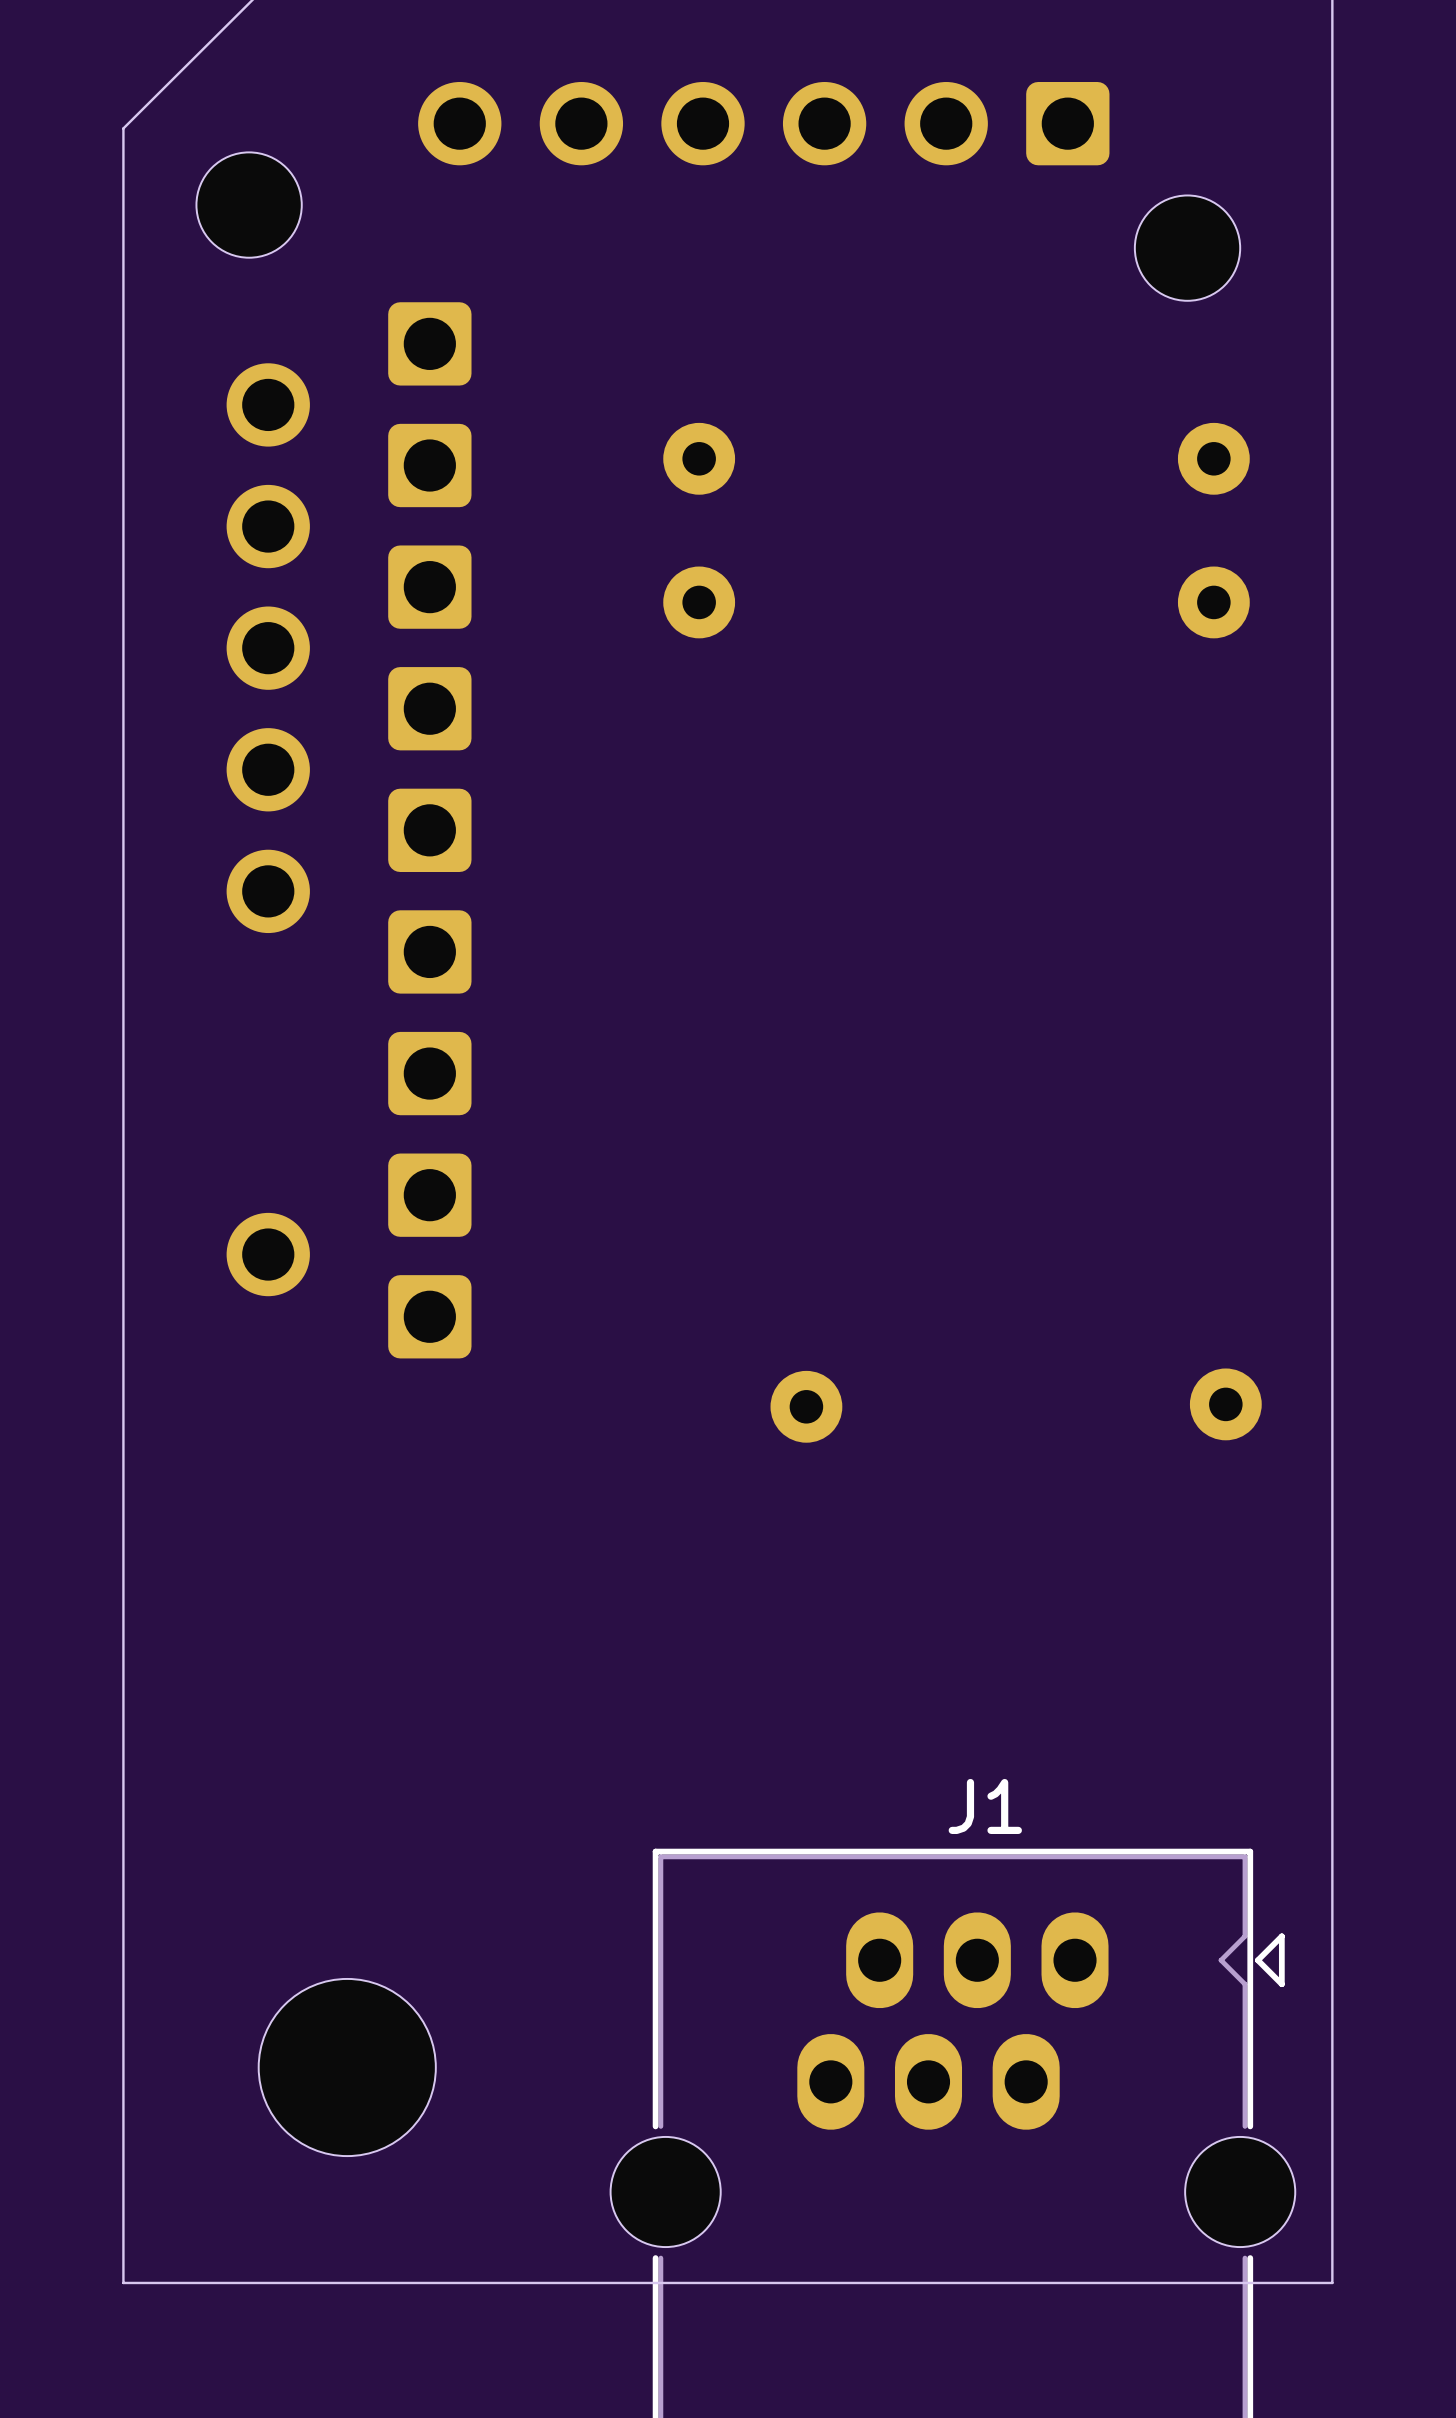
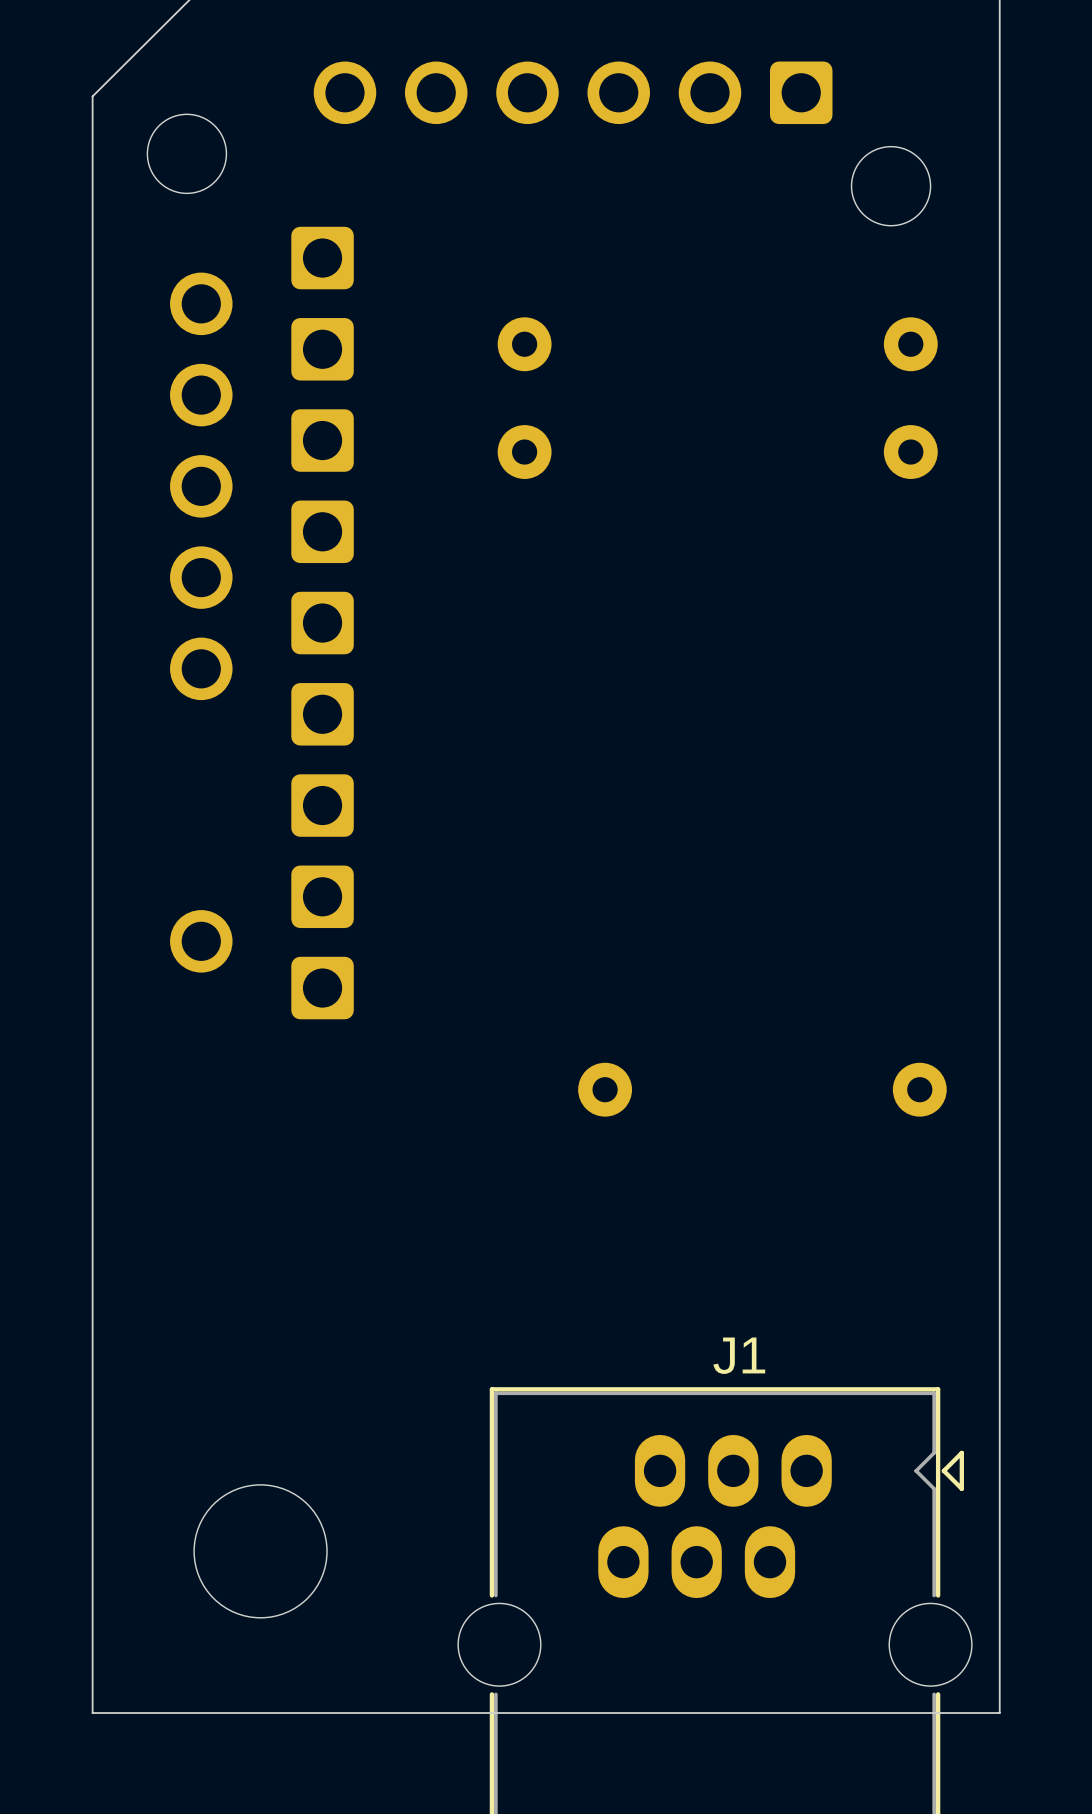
part position: (1225, 1404) -> (919, 1089)
part position: (806, 1406) -> (605, 1089)

